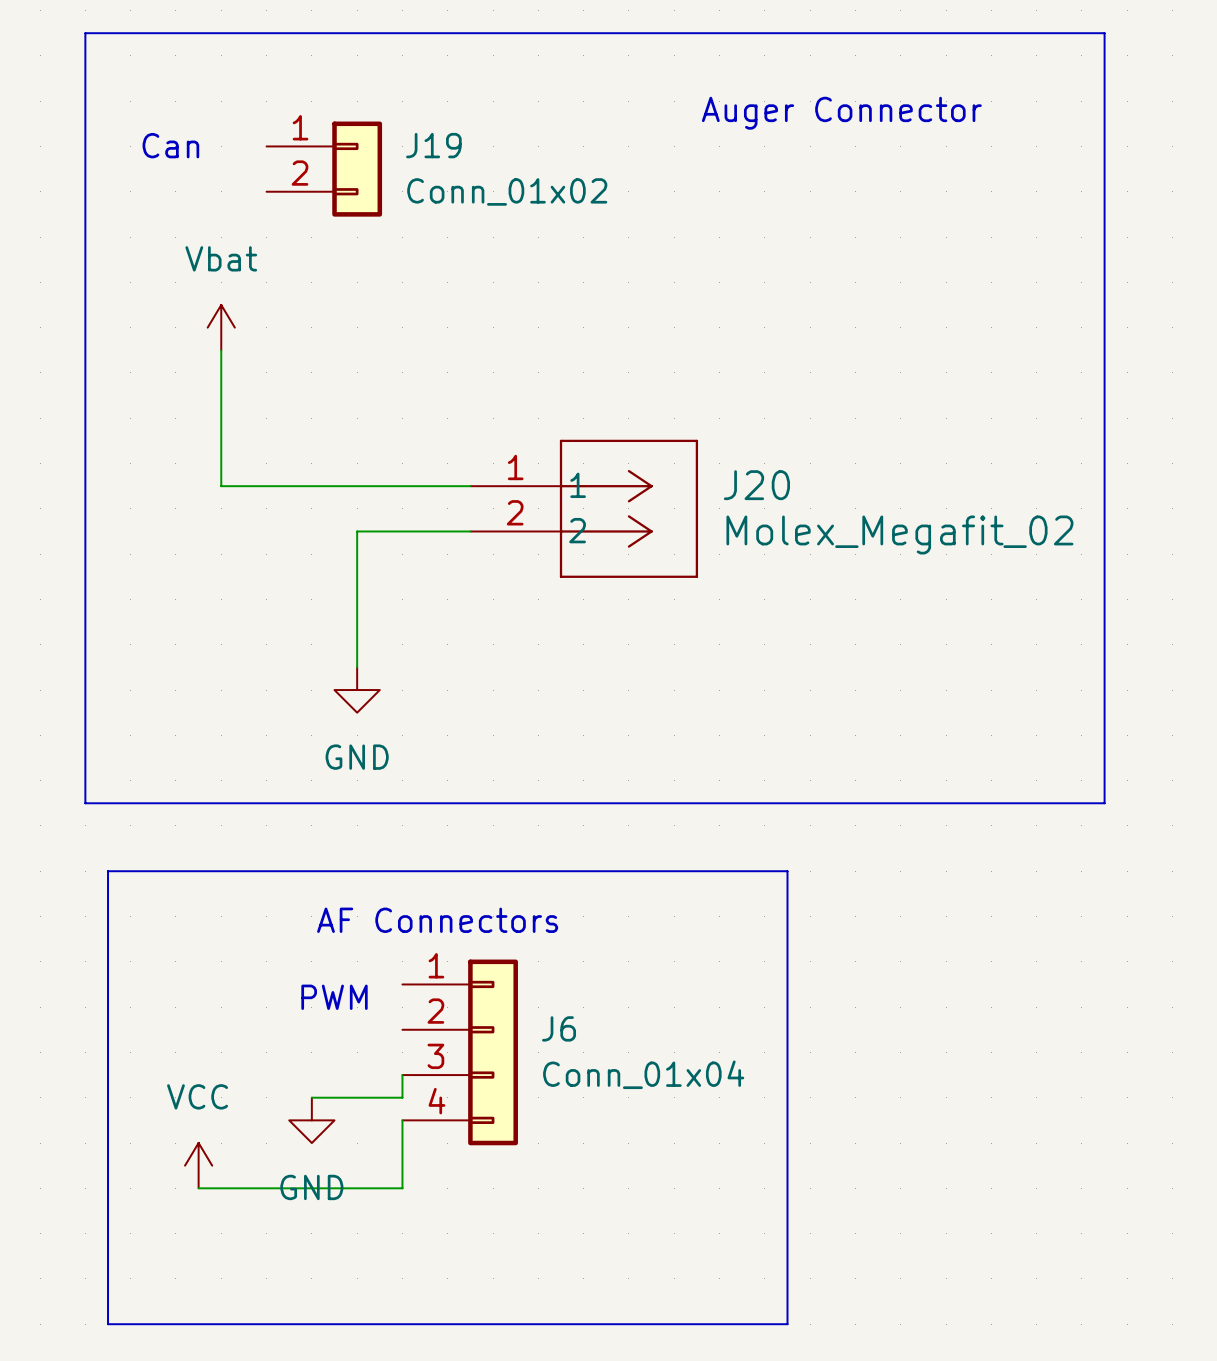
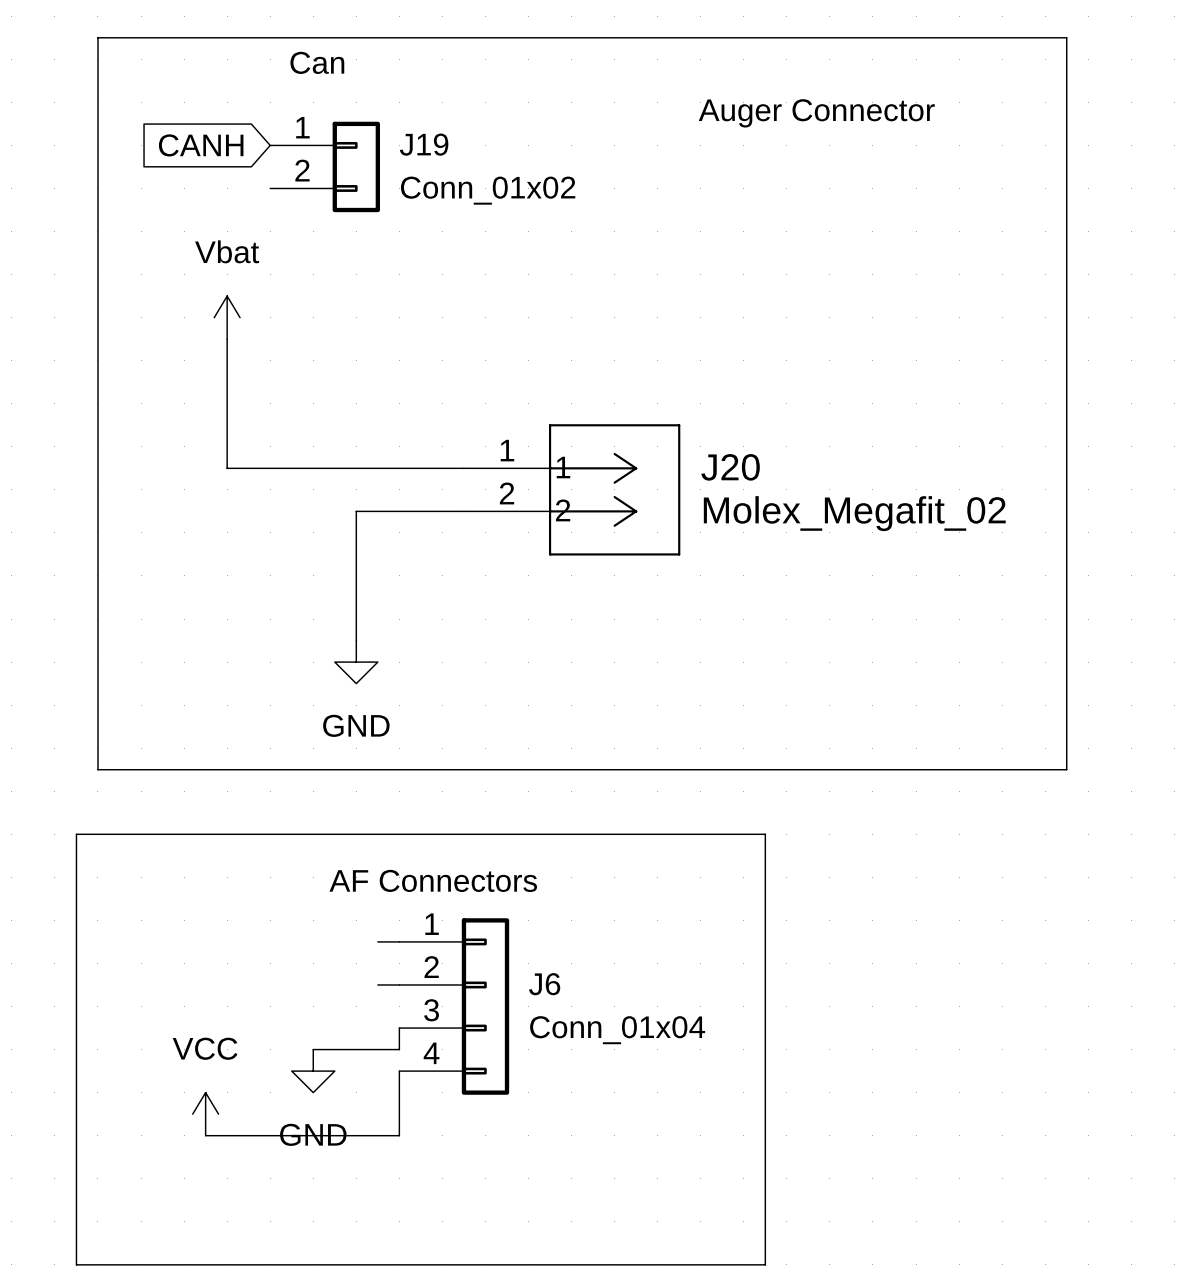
text position: Can (170, 145) -> Can (317, 62)
global label: none -> CANH (201, 145)
line: (108, 871) (108, 1324) -> (119, 834) (76, 834) (76, 1264) (119, 1264)
wire: none -> (377, 941) (399, 941)
text: PWM (334, 997) -> none
wire: none -> (377, 984) (399, 984)

